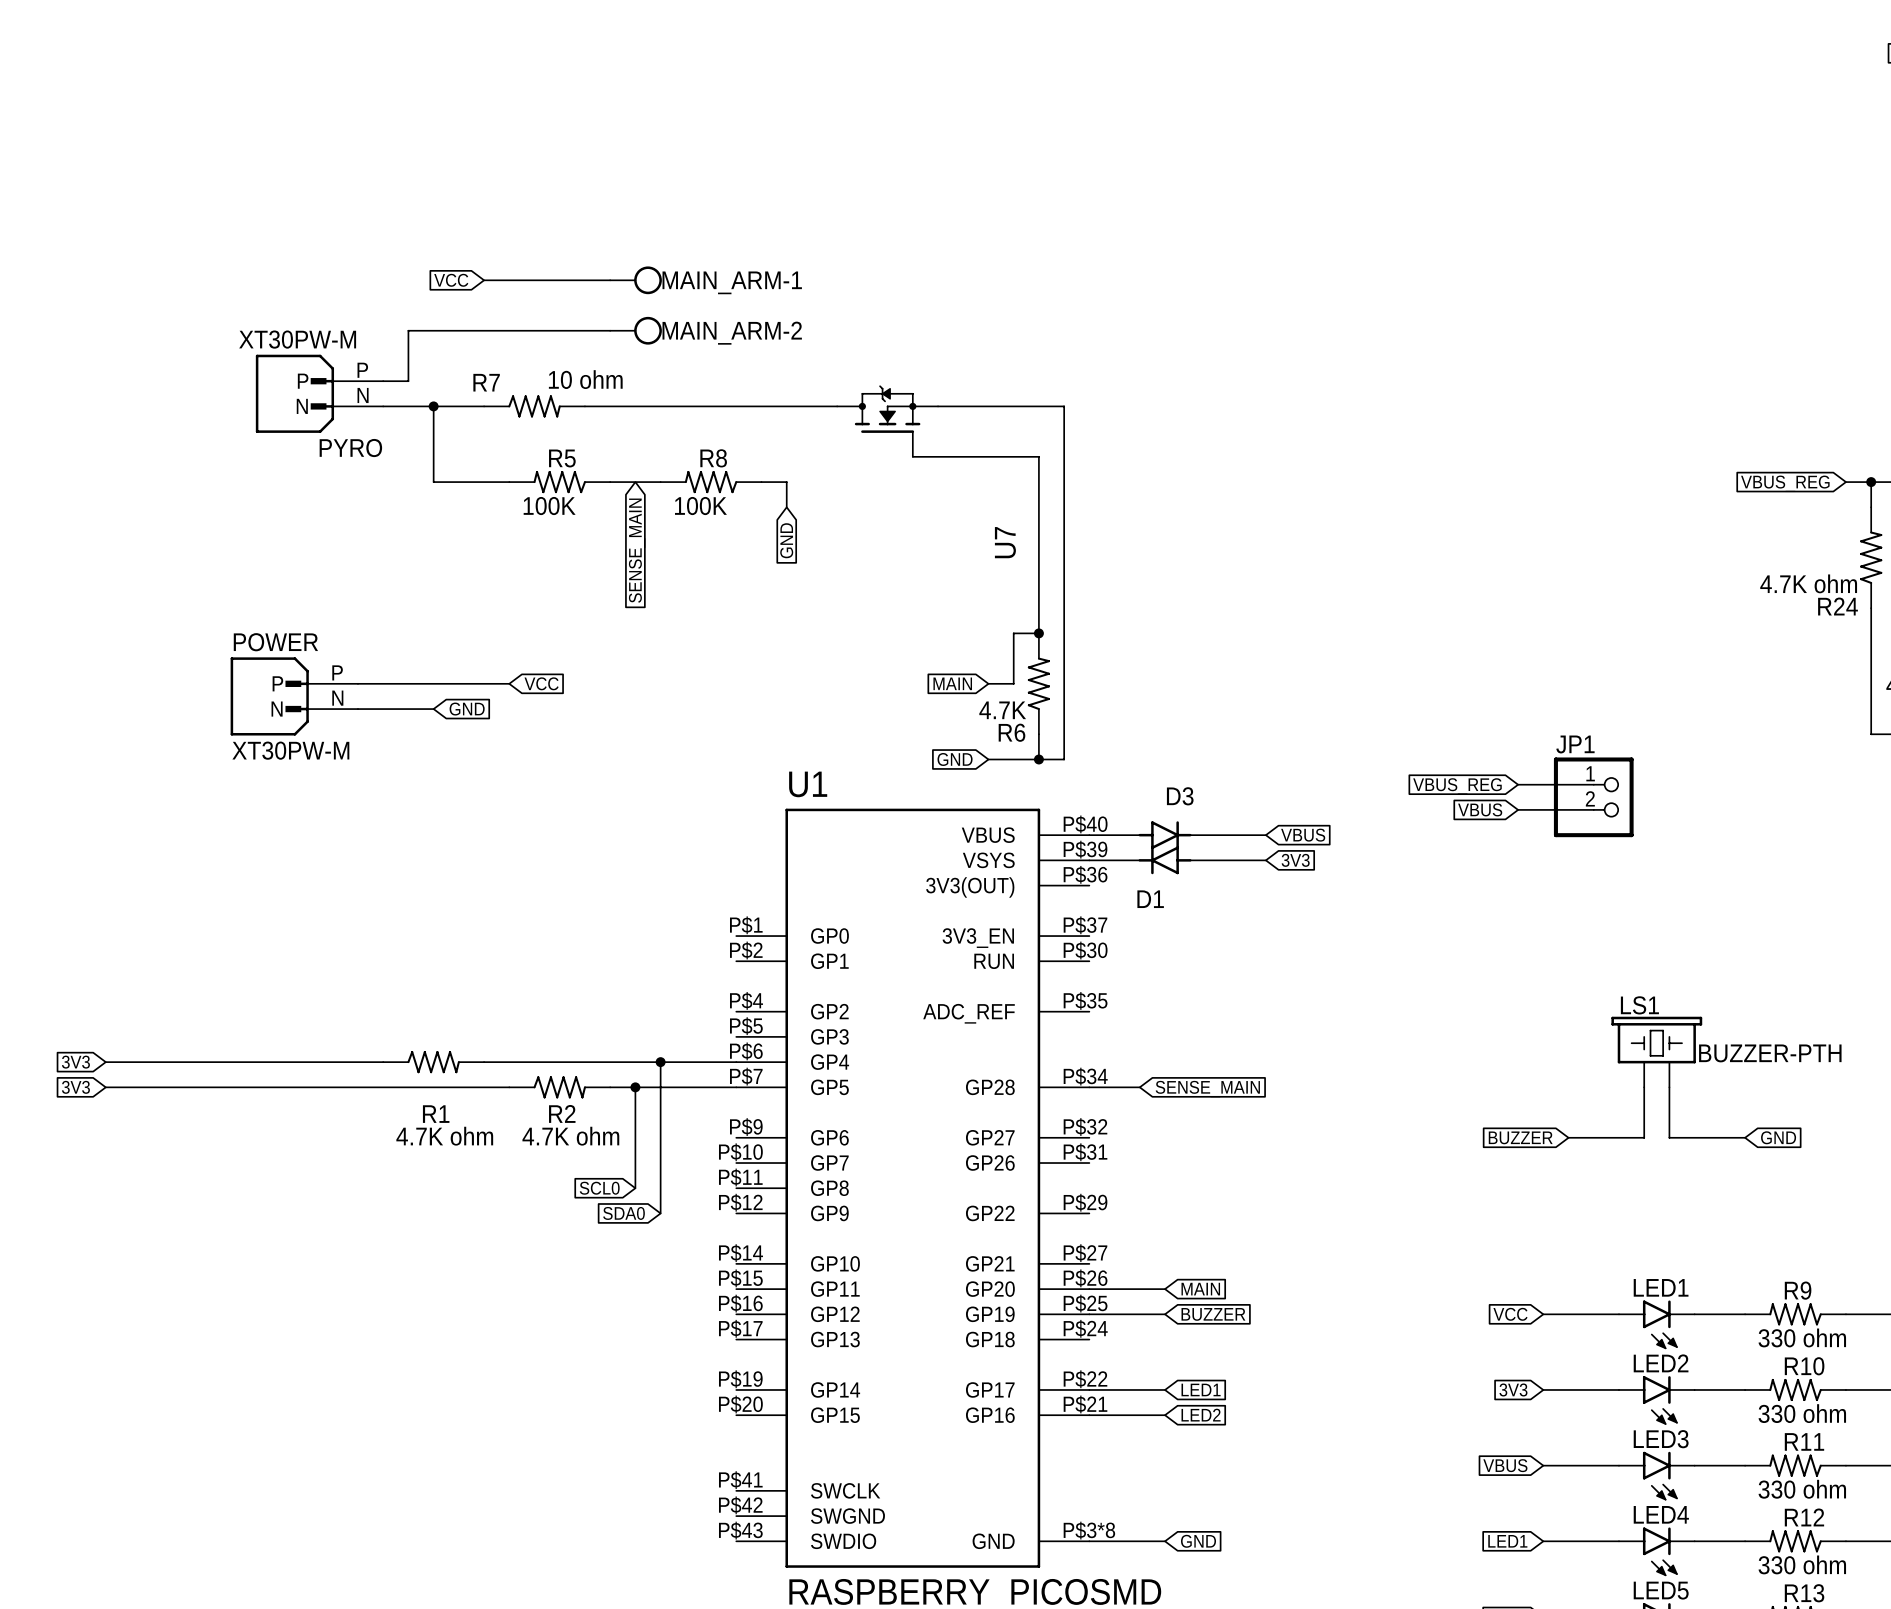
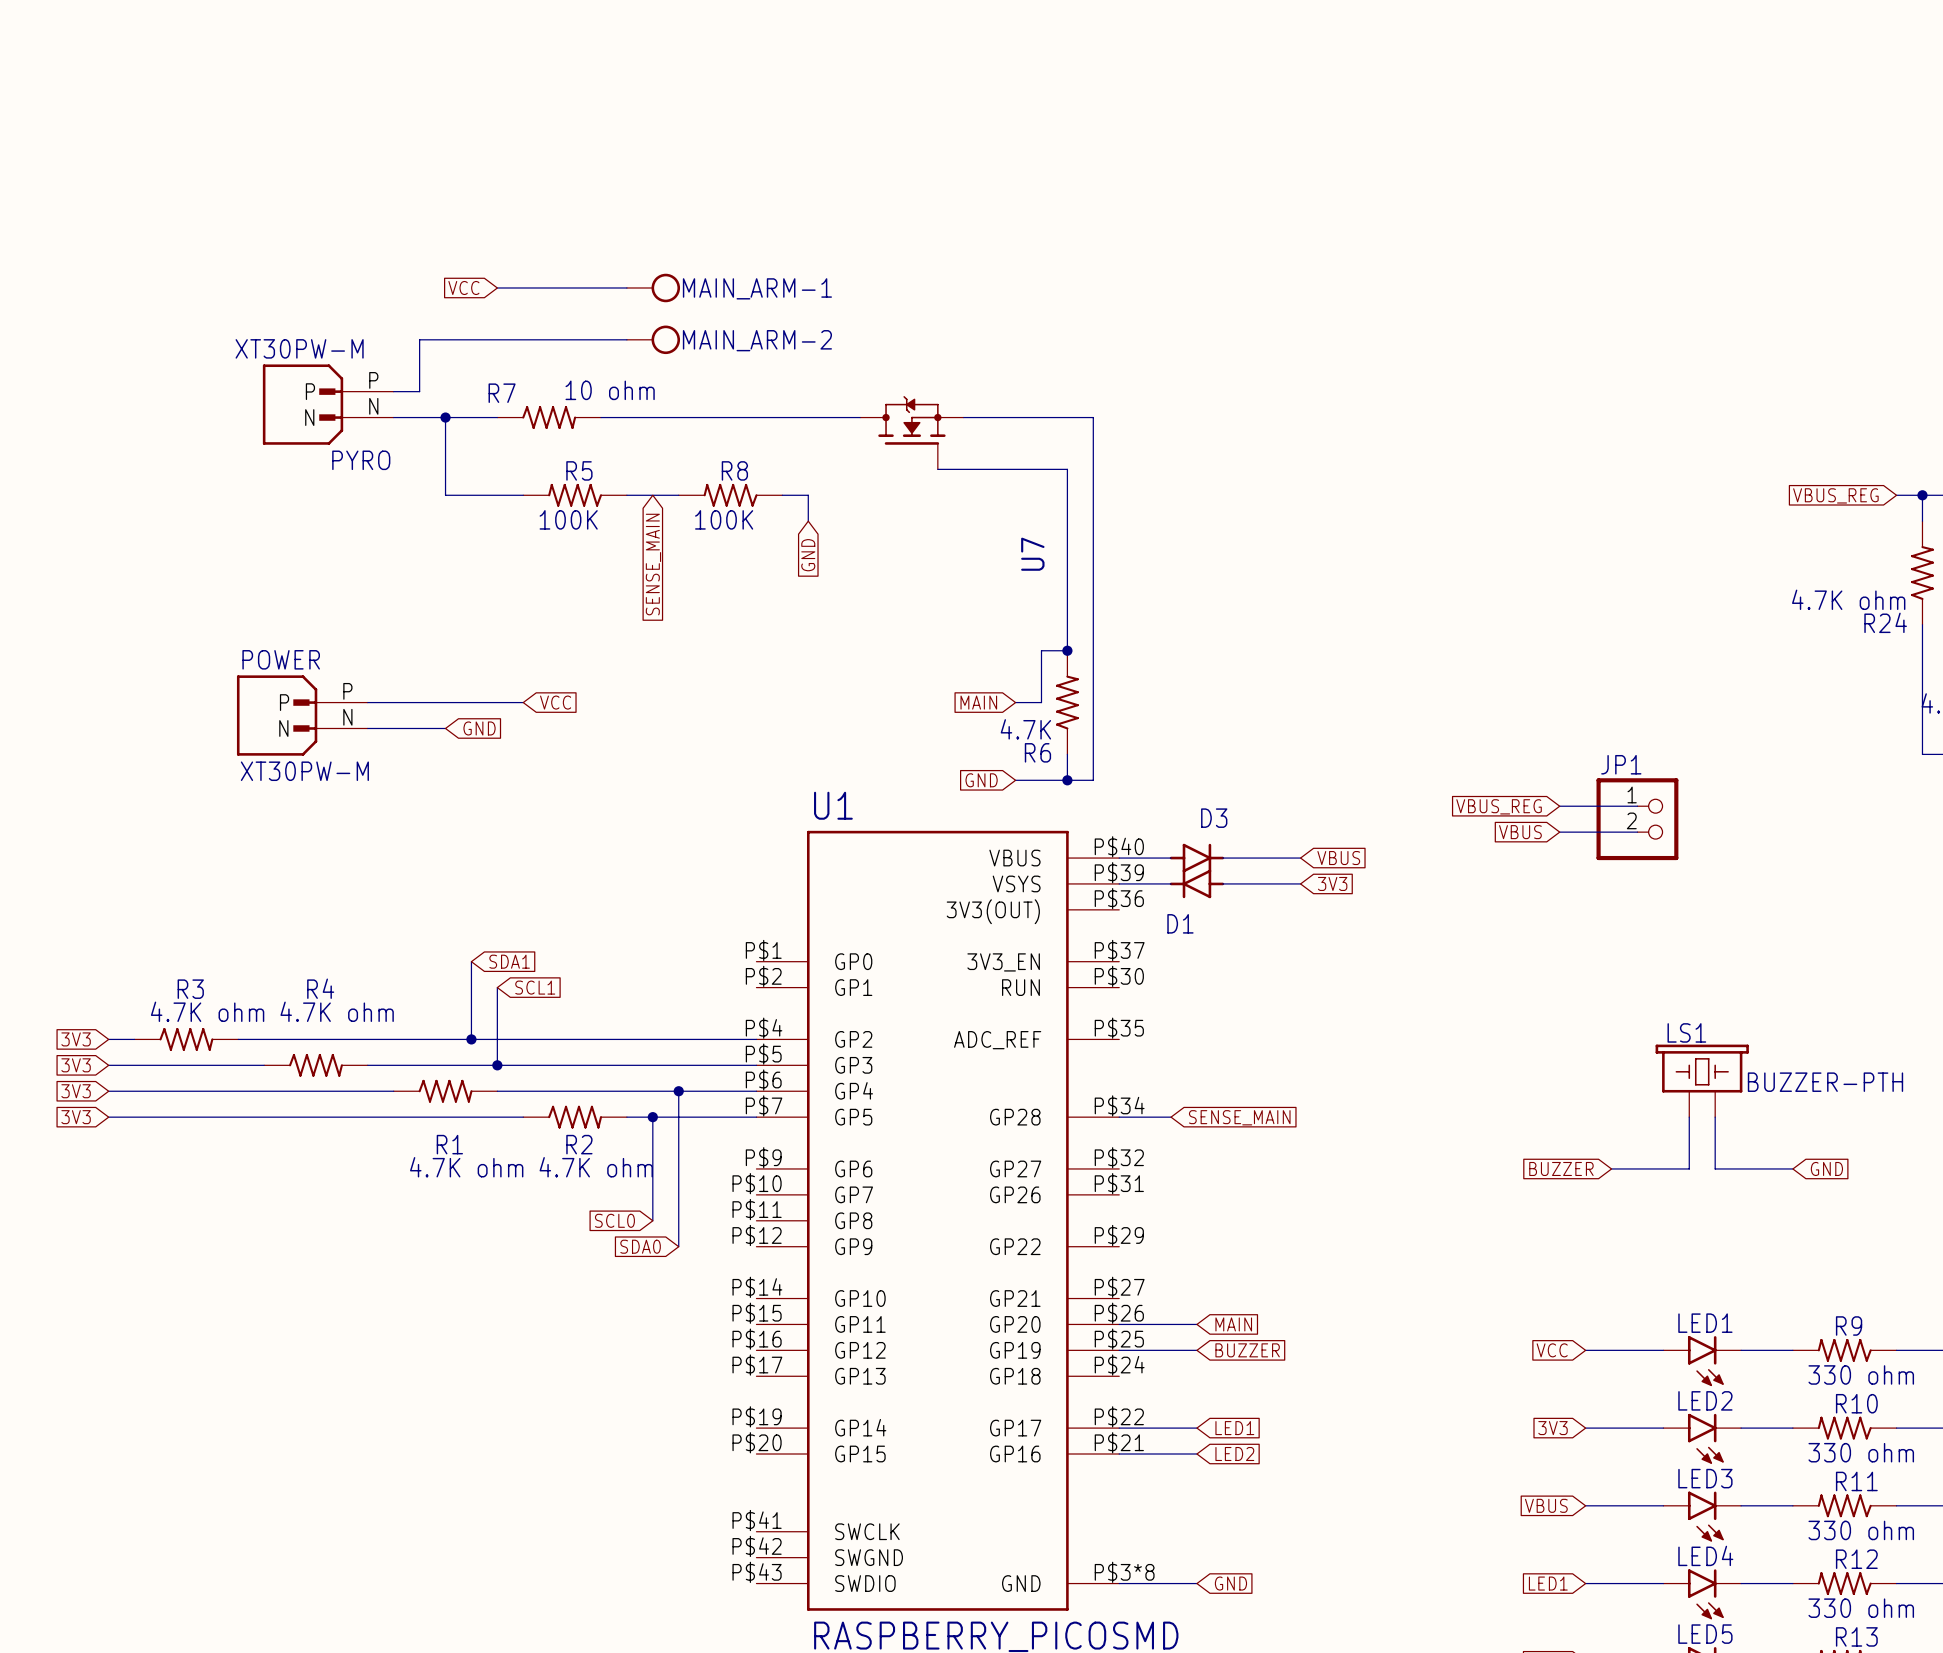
wire: none -> (471, 961) (471, 1039)
global label: none -> SDA1 (509, 961)
wire: none -> (497, 987) (497, 1065)
global label: none -> SCL1 (535, 987)
global label: none -> 3V3 (76, 1039)
wire: none -> (108, 1039) (134, 1039)
R3: none -> 4.7K ohm (186, 1039)
wire: none -> (238, 1039) (756, 1039)
junction: none -> (471, 1039)
global label: none -> 3V3 (76, 1065)
wire: none -> (108, 1065) (264, 1065)
R4: none -> 4.7K ohm (315, 1065)
wire: none -> (367, 1065) (756, 1065)
junction: none -> (497, 1065)

